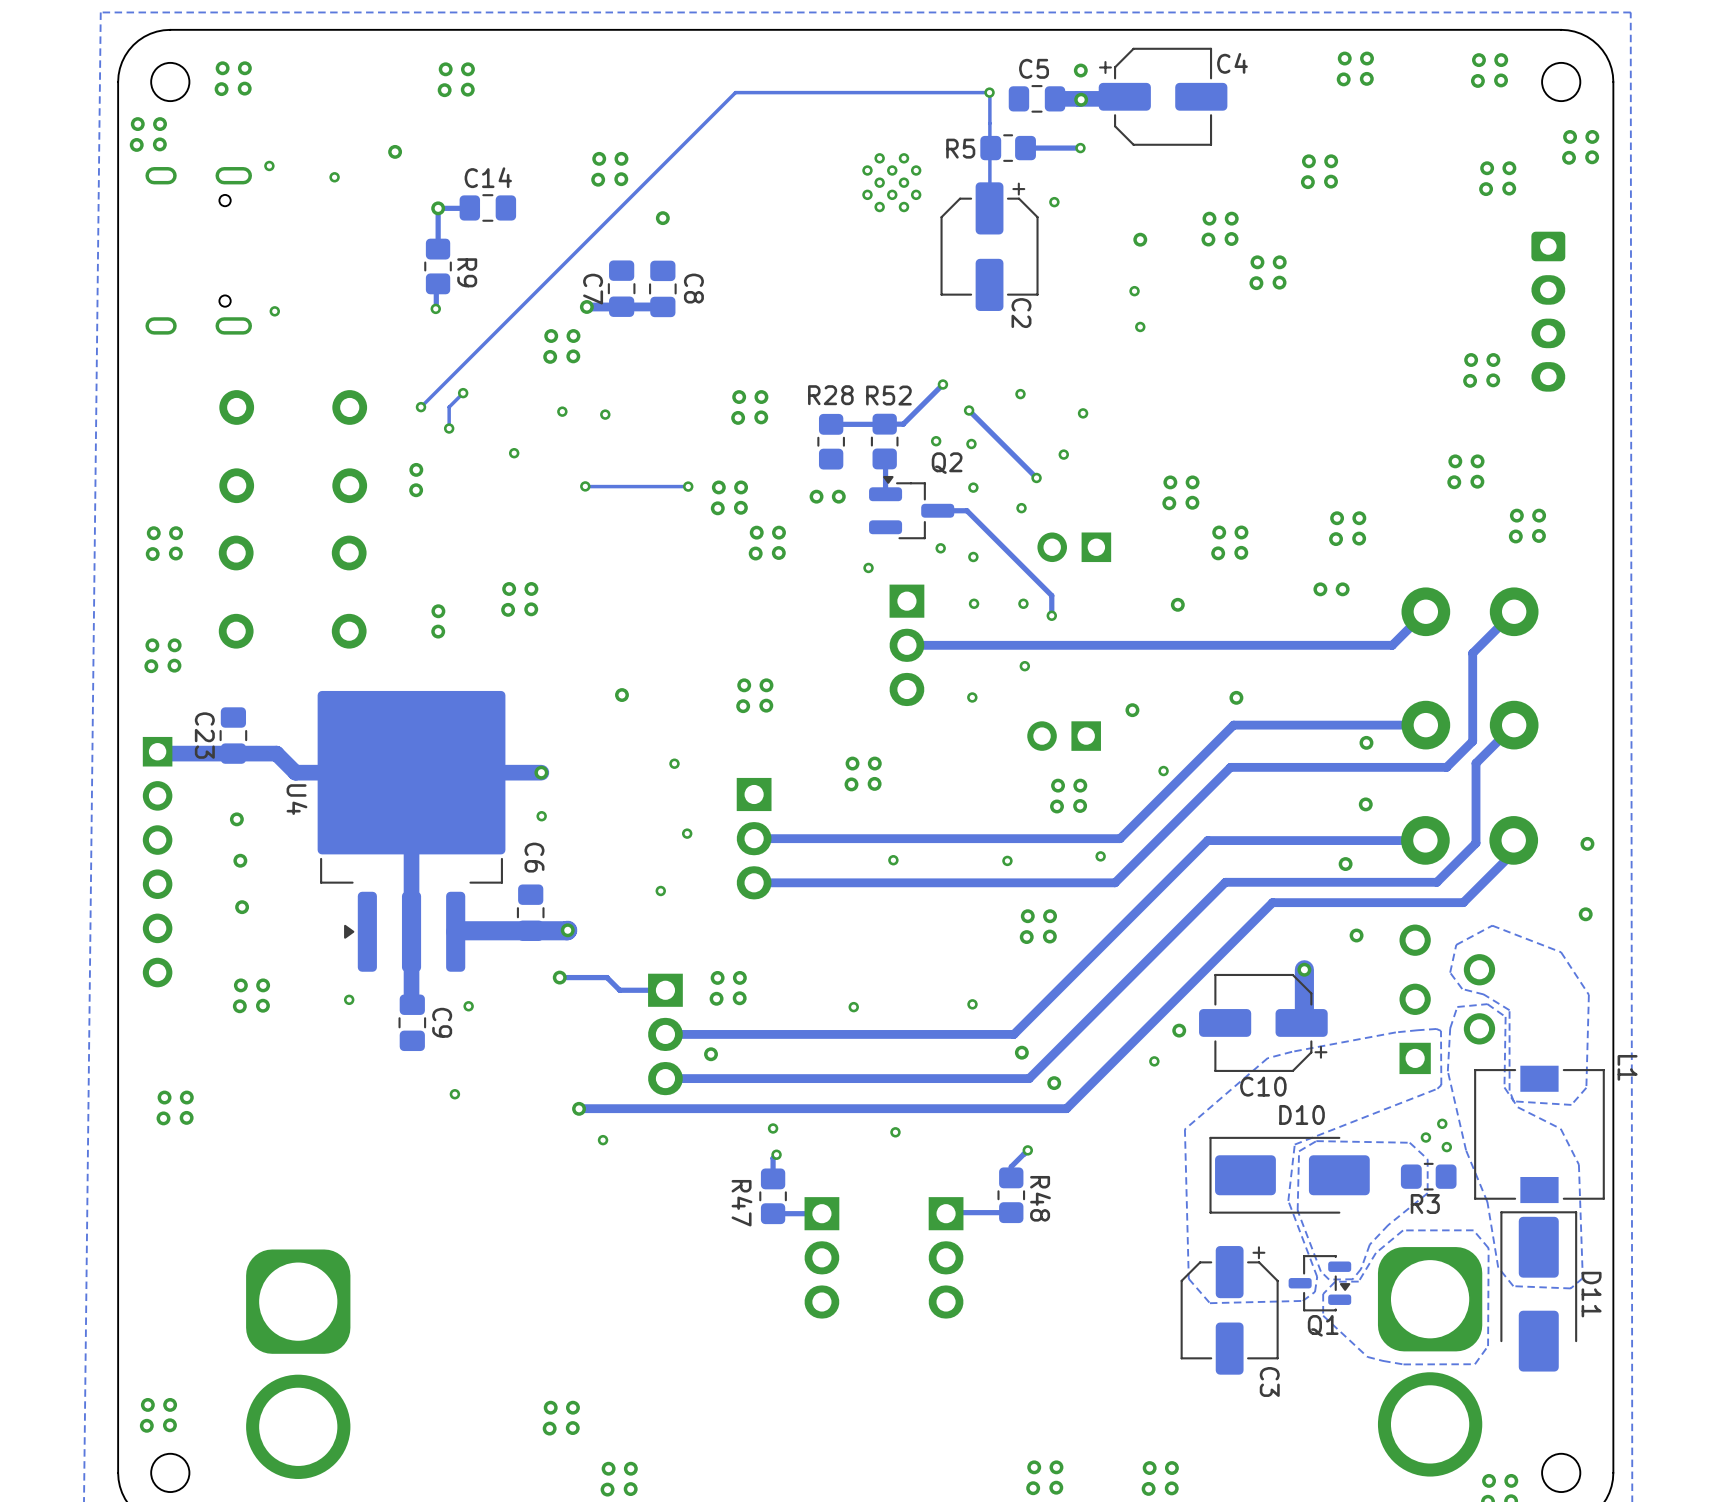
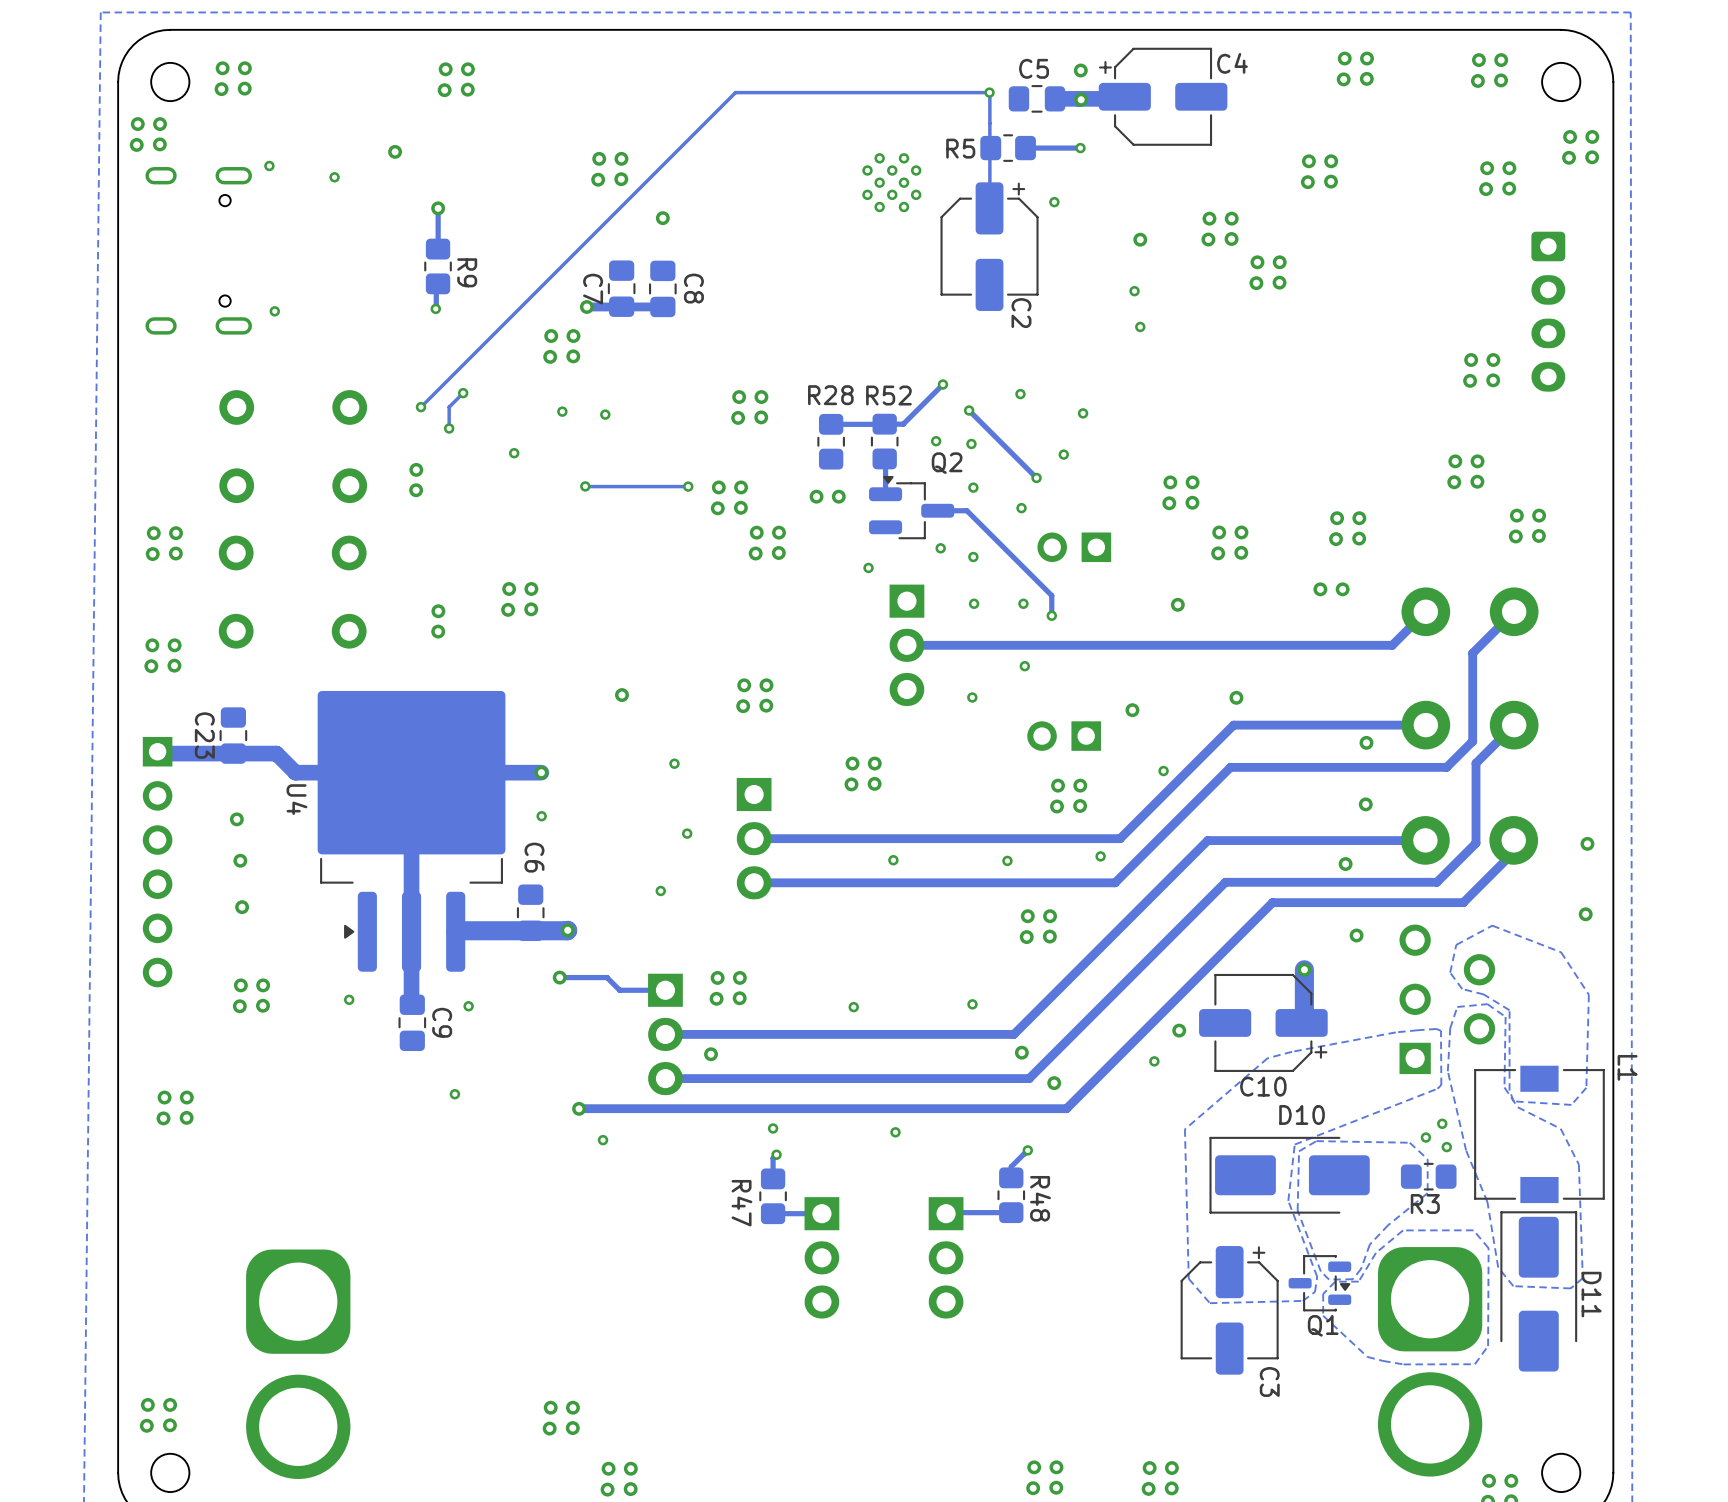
track: (469, 207) (438, 208) -> none
C14: (487, 207) -> none

